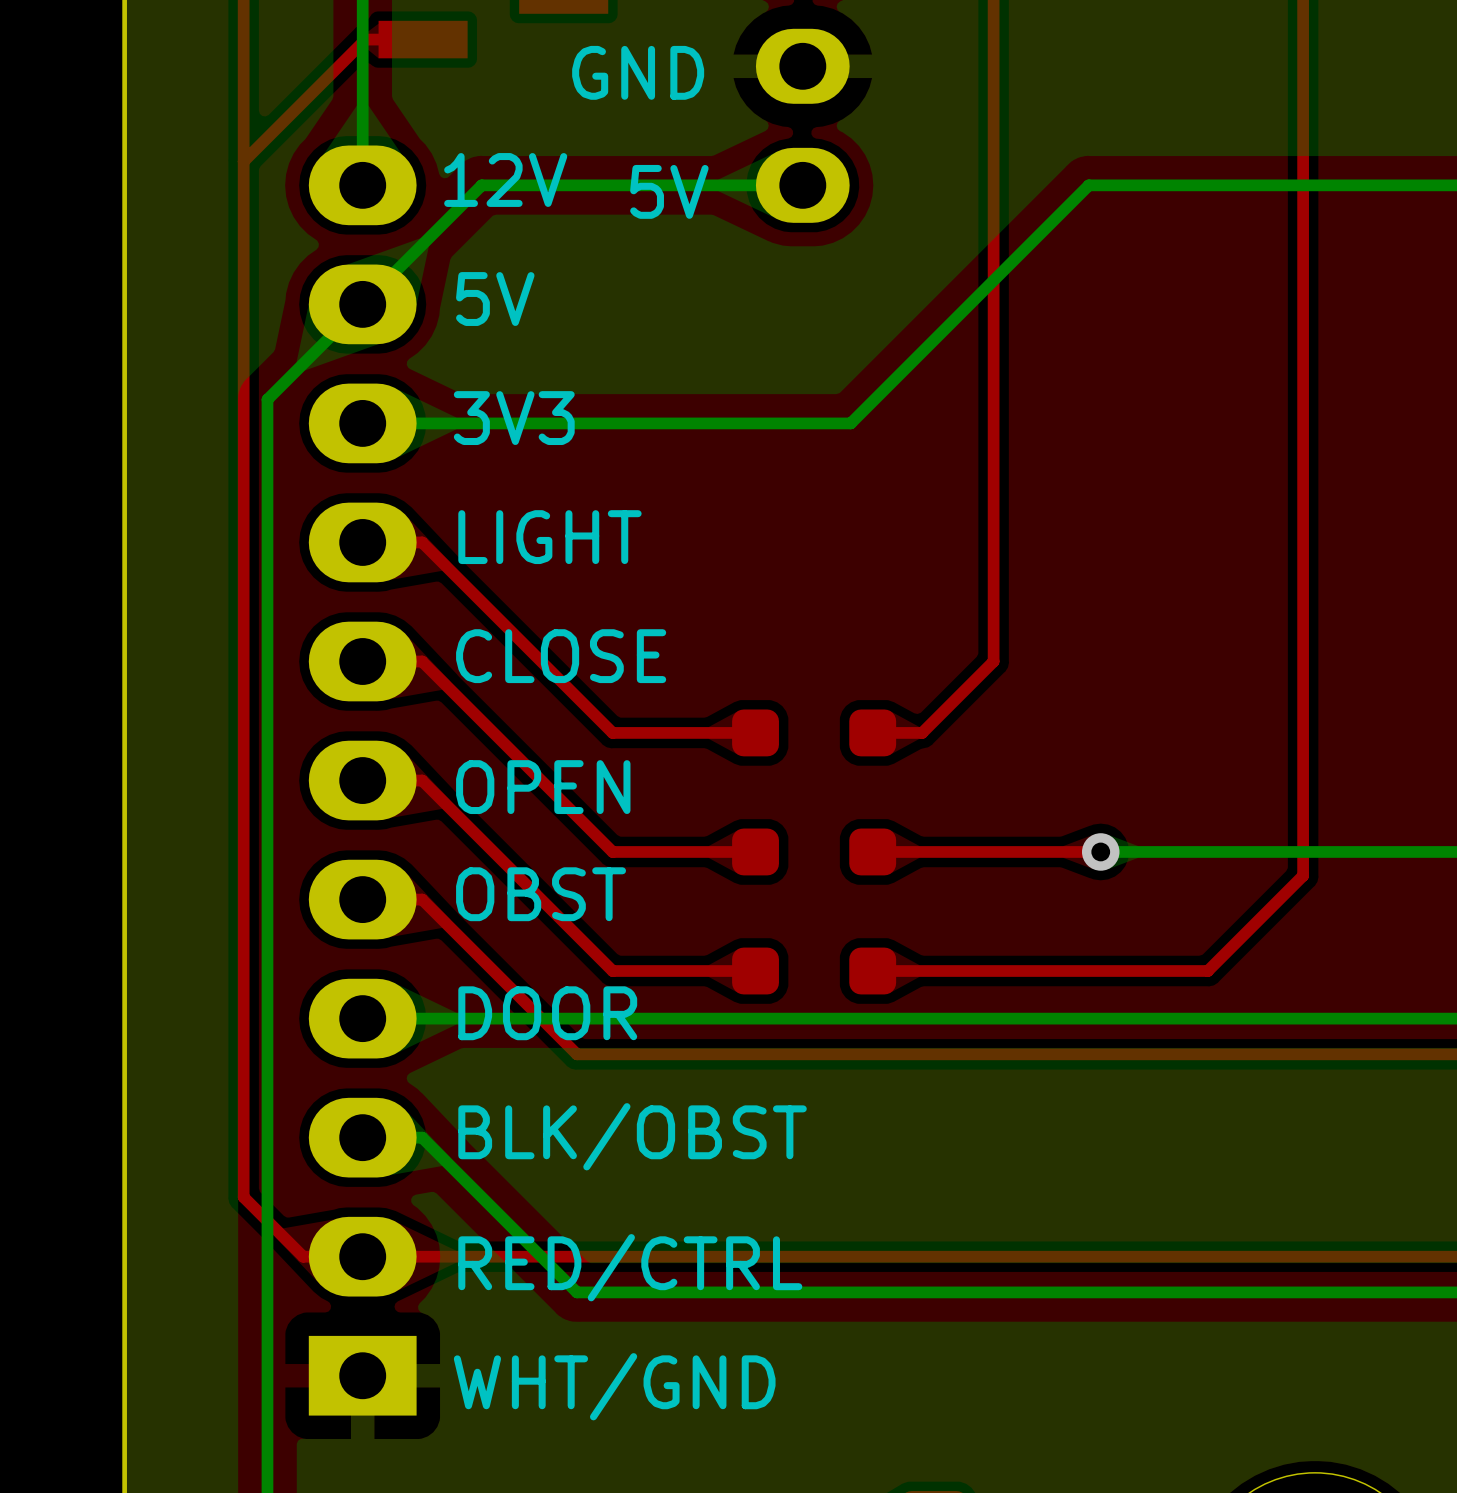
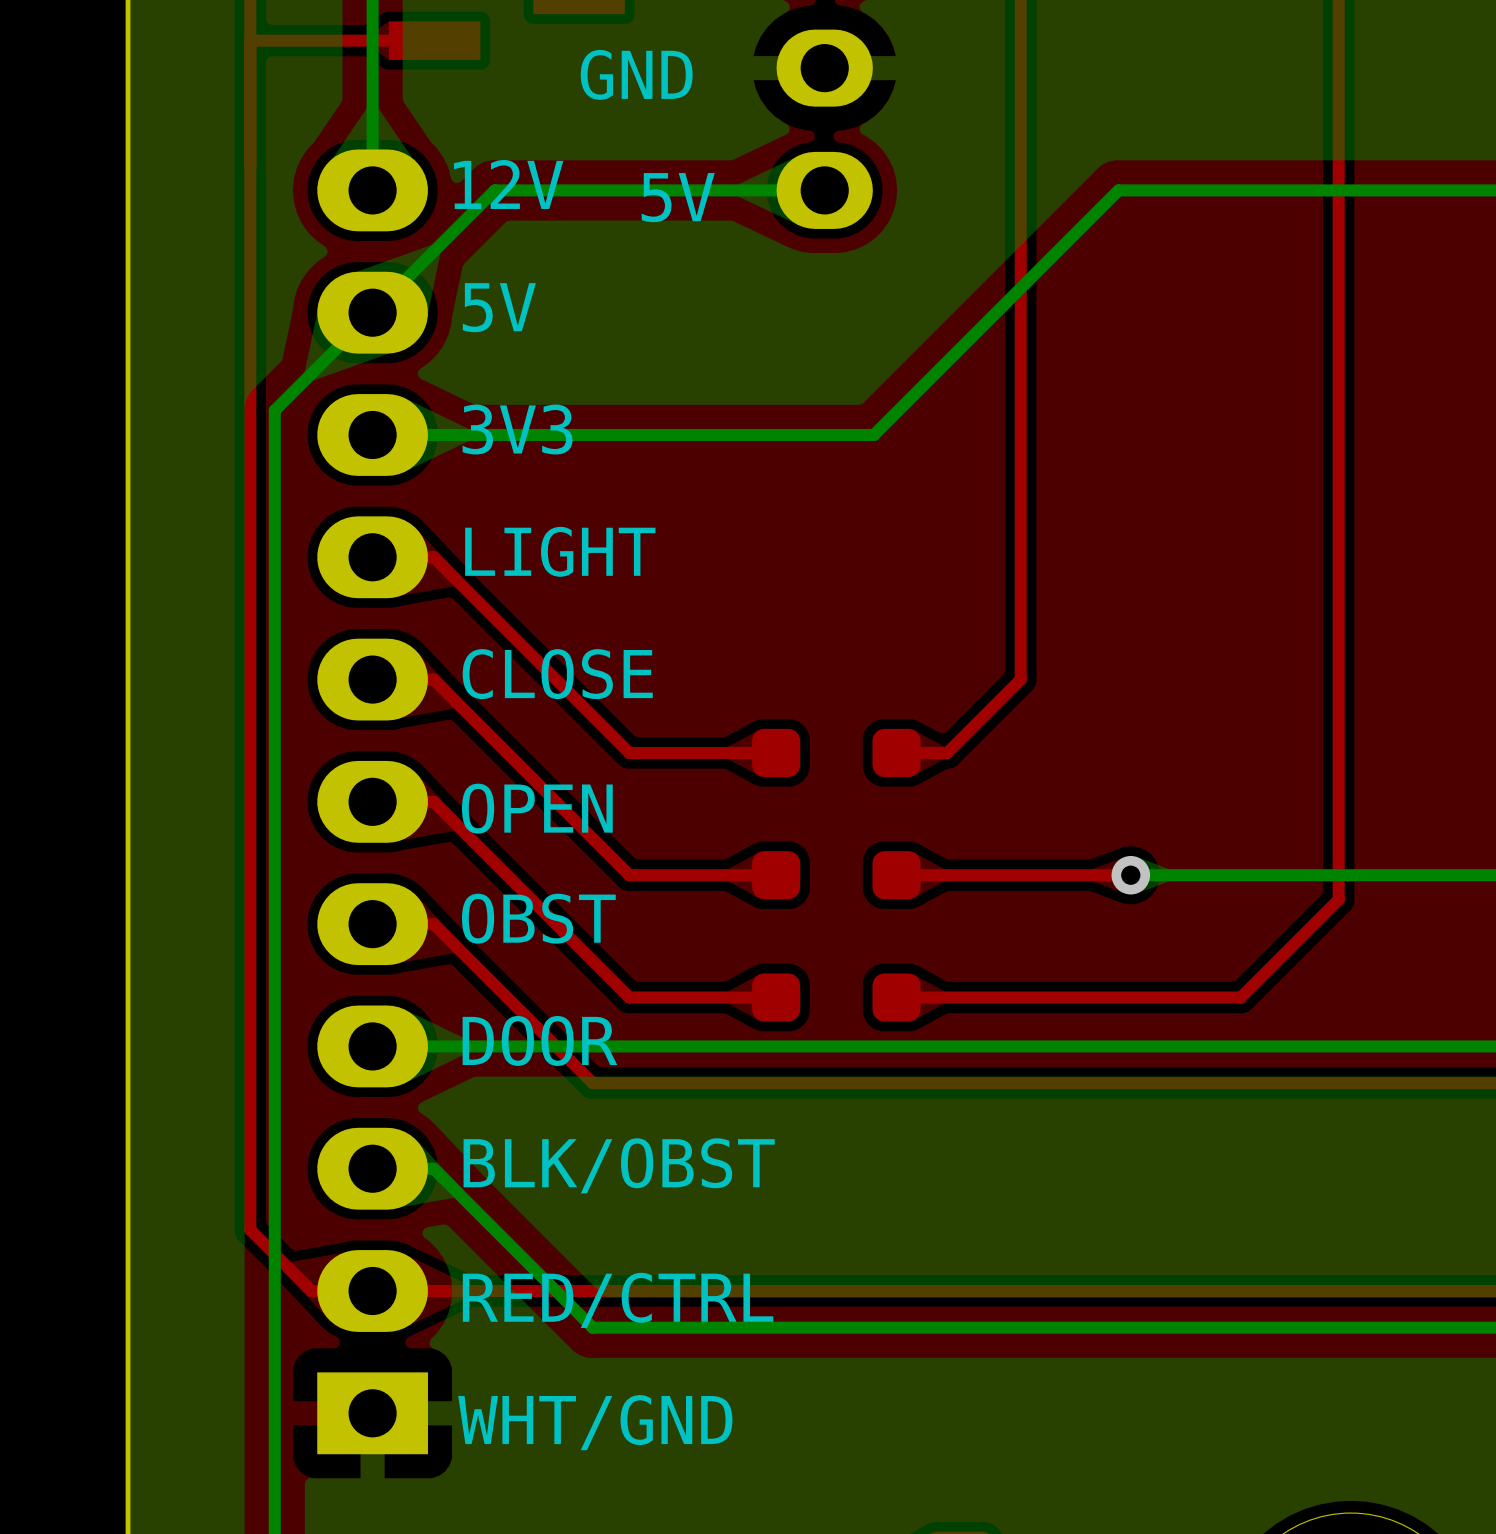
top track: (365, 39) (243, 161) -> (375, 40) (250, 40)

